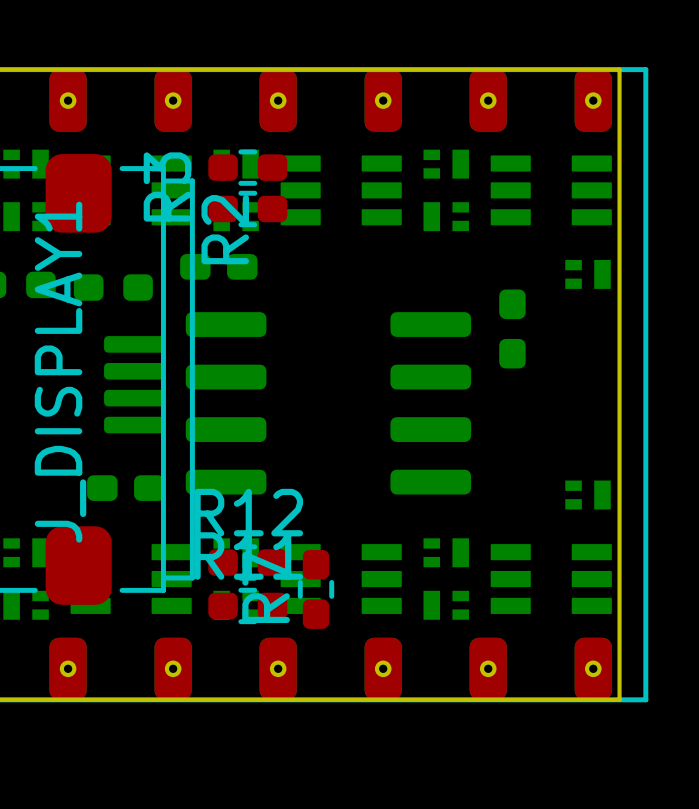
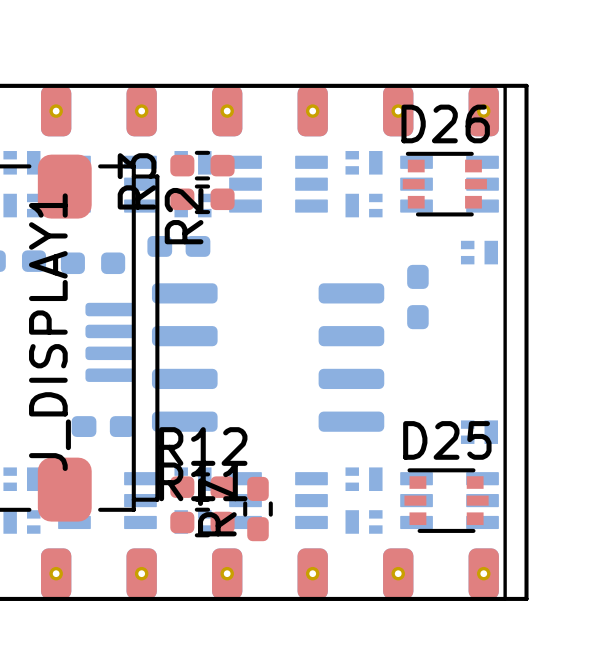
D26: none -> (444, 184)
D25: none -> (446, 500)

